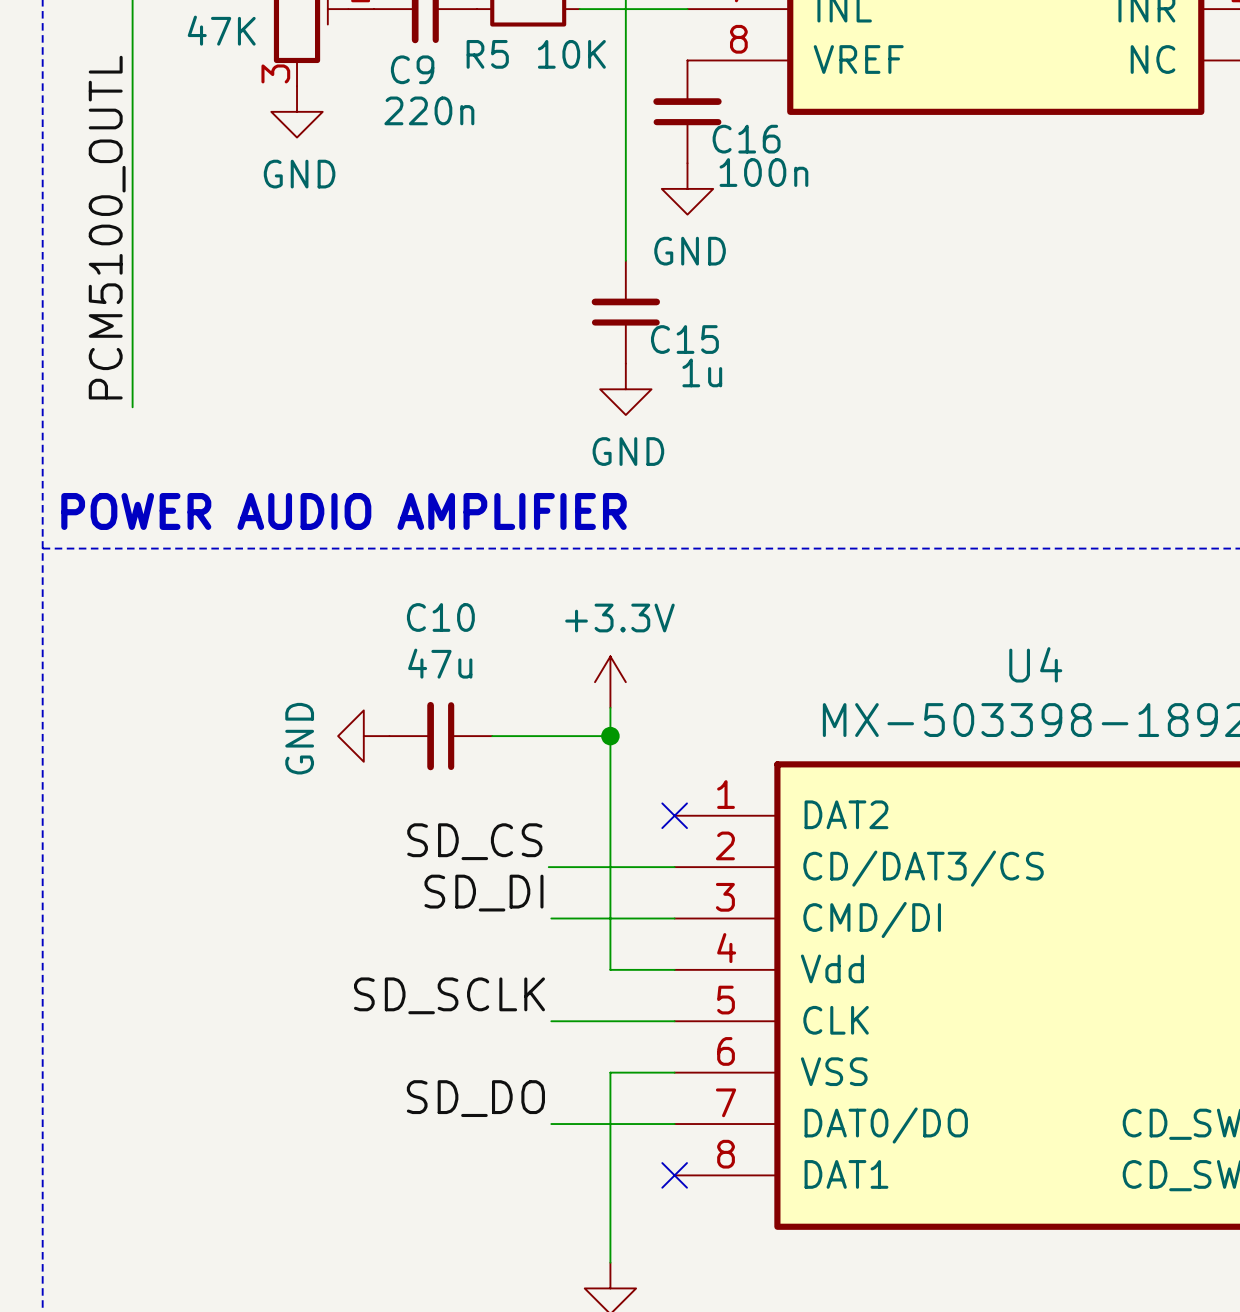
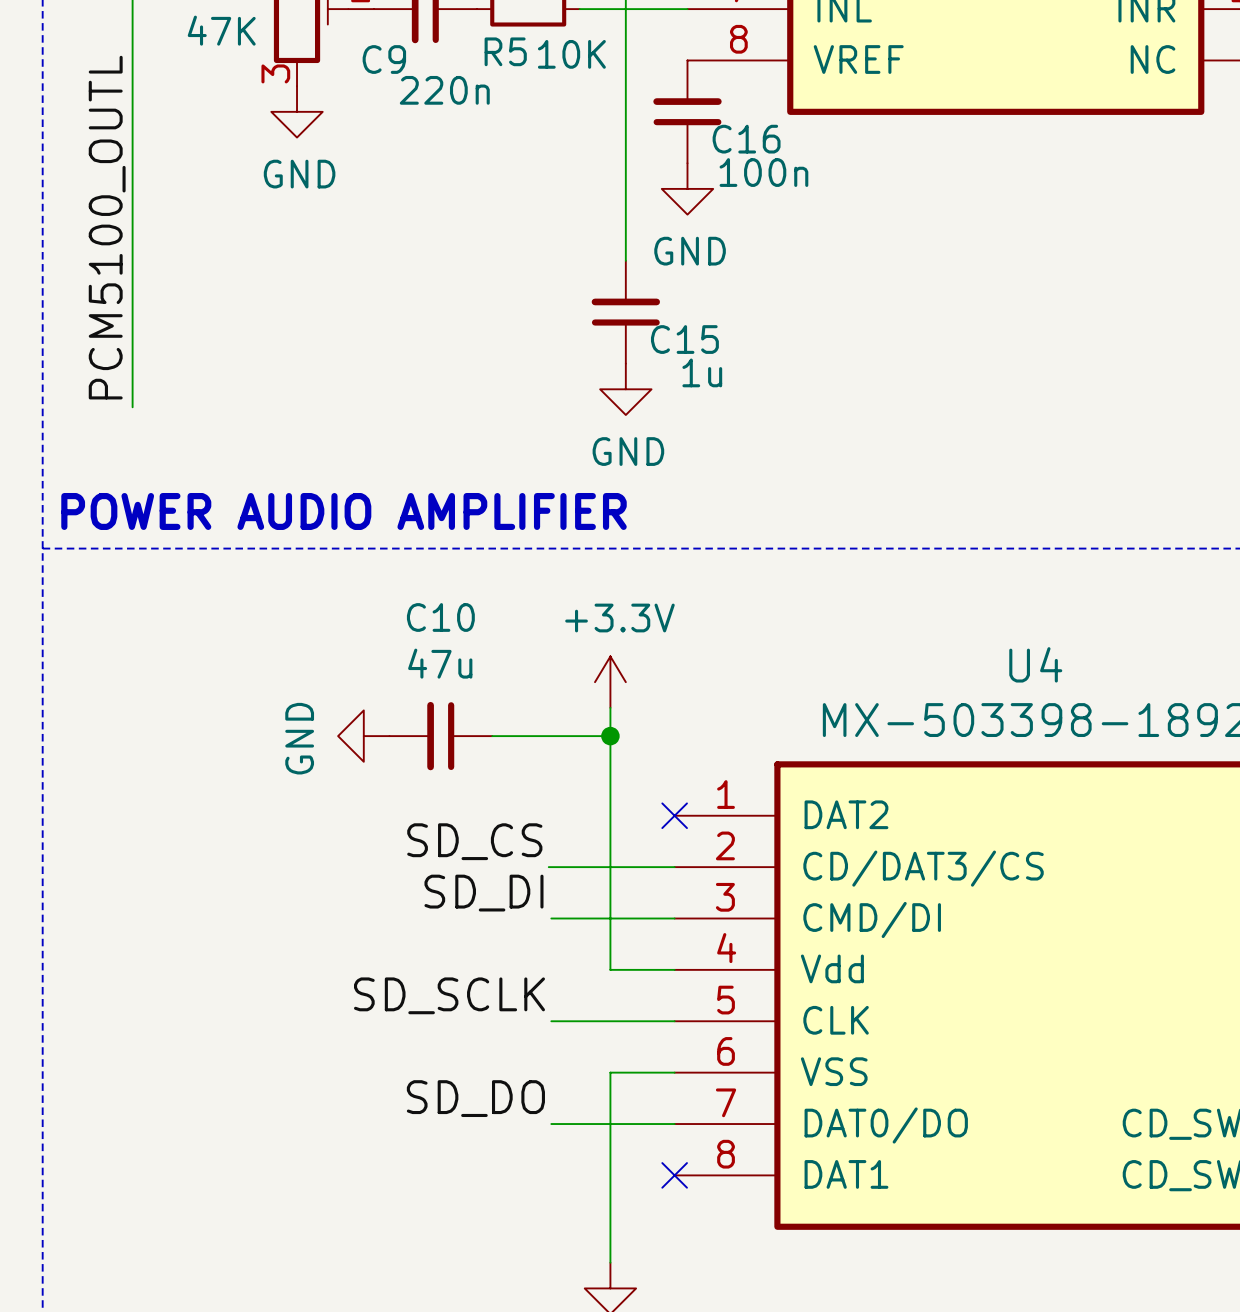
R5 name position: R5 (487, 54) -> R5 (505, 51)
C9 name position: C9 (412, 69) -> C9 (384, 59)
C9 value position: 220n (429, 110) -> 220n (444, 90)

